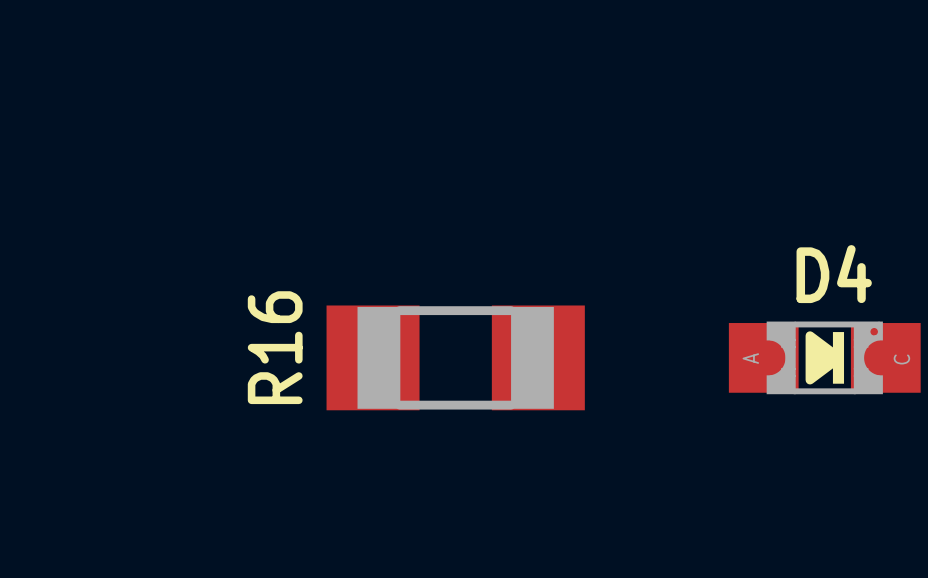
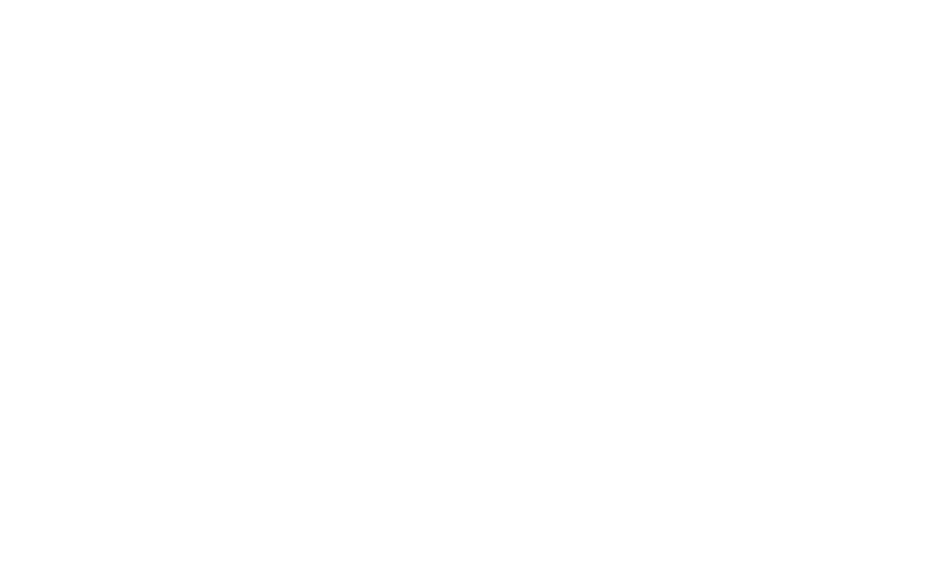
R16: (455, 357) -> none
D4: (824, 357) -> none

